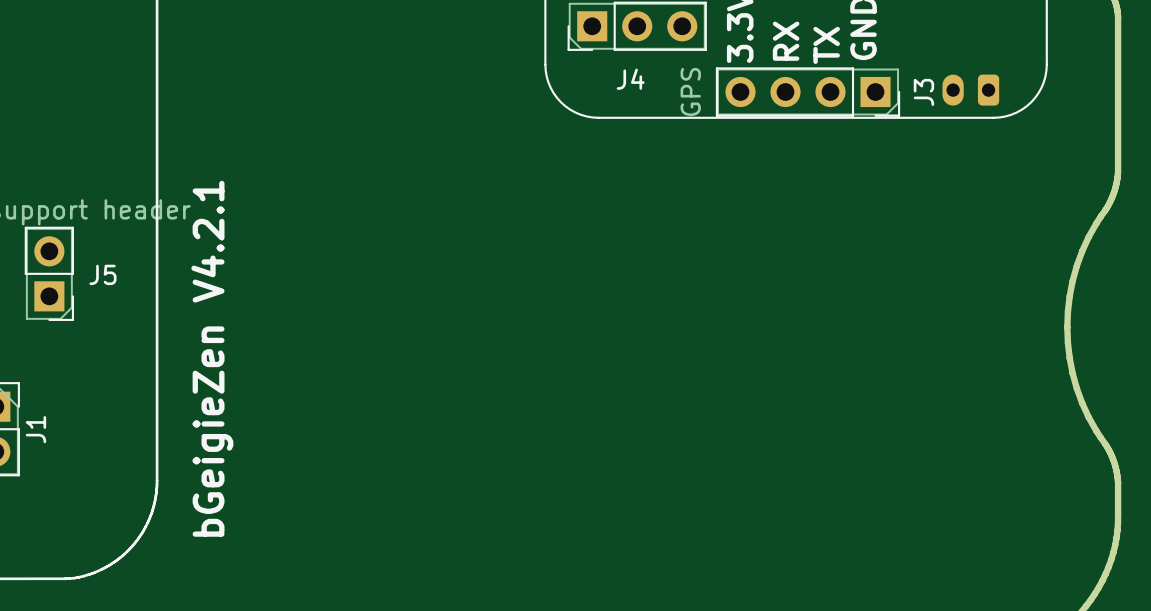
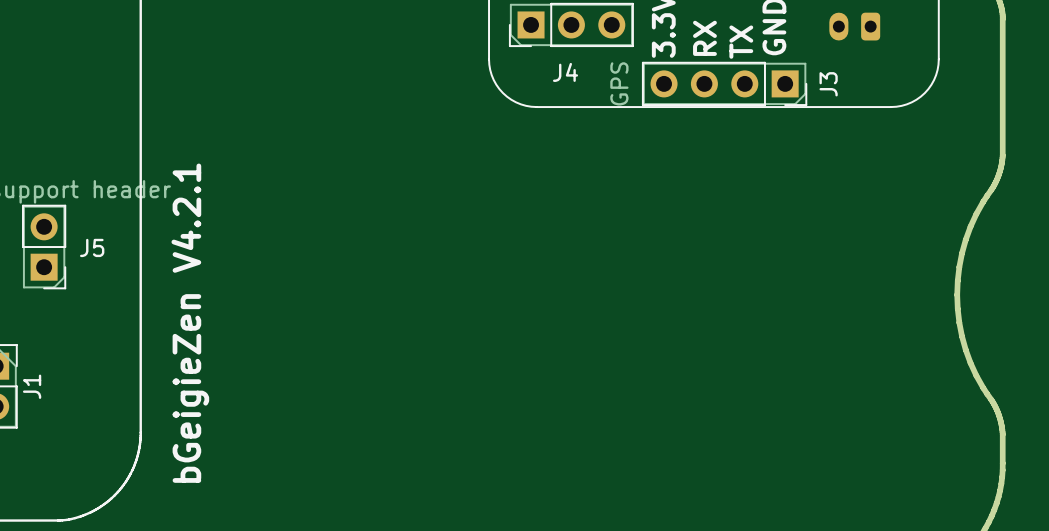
part position: (970, 90) -> (854, 26)

